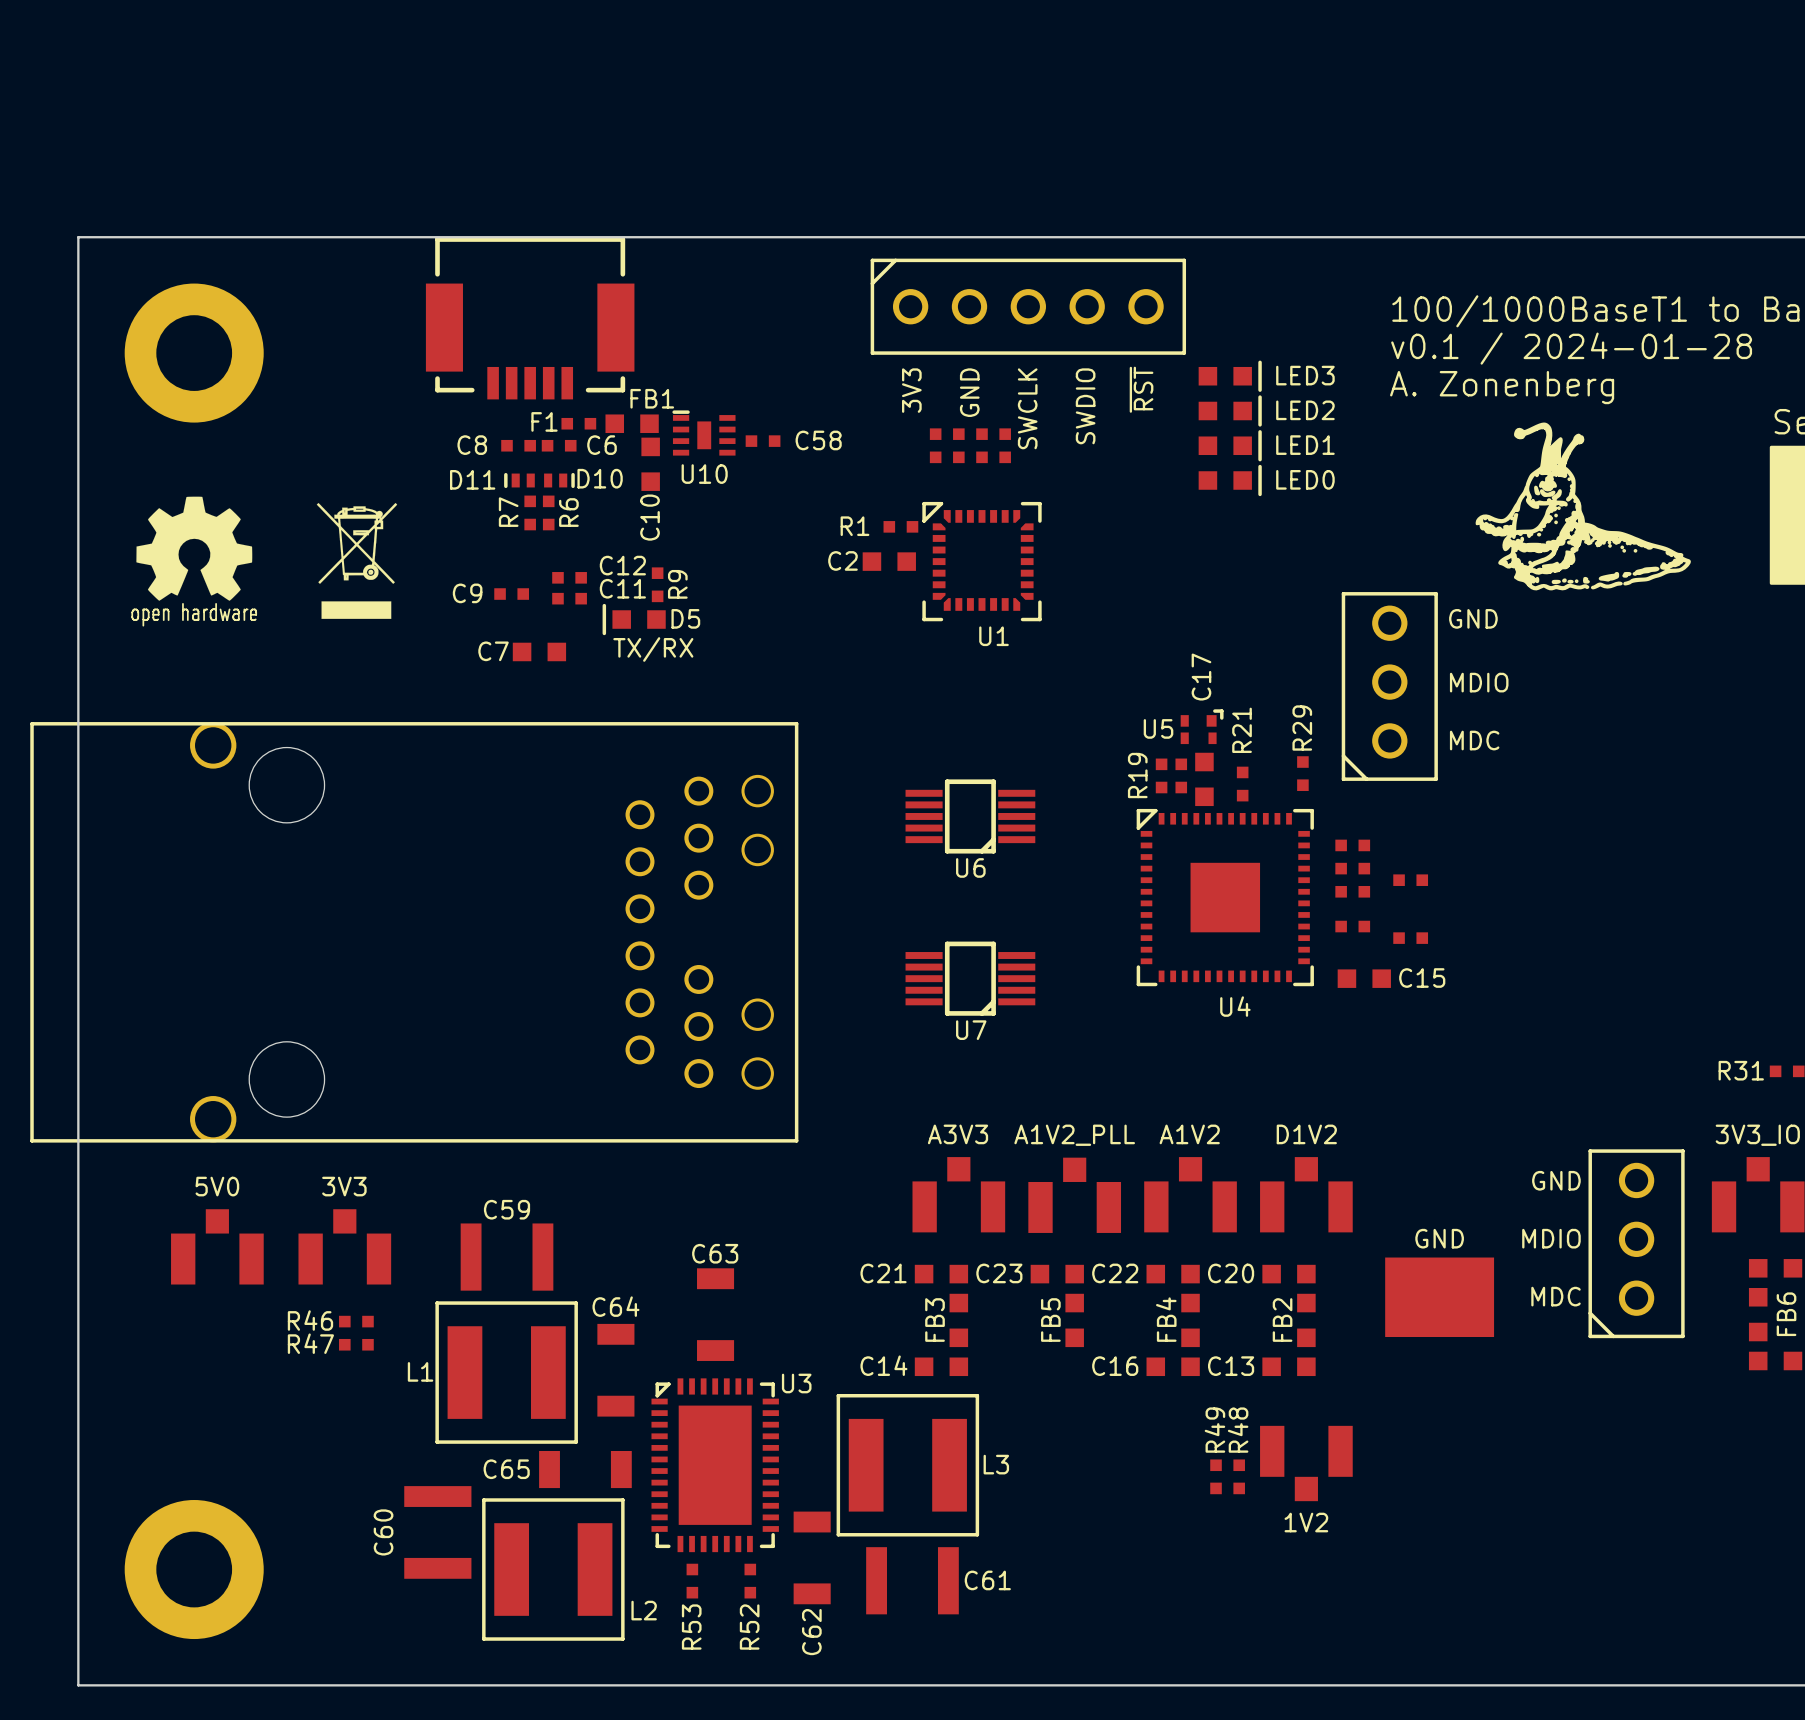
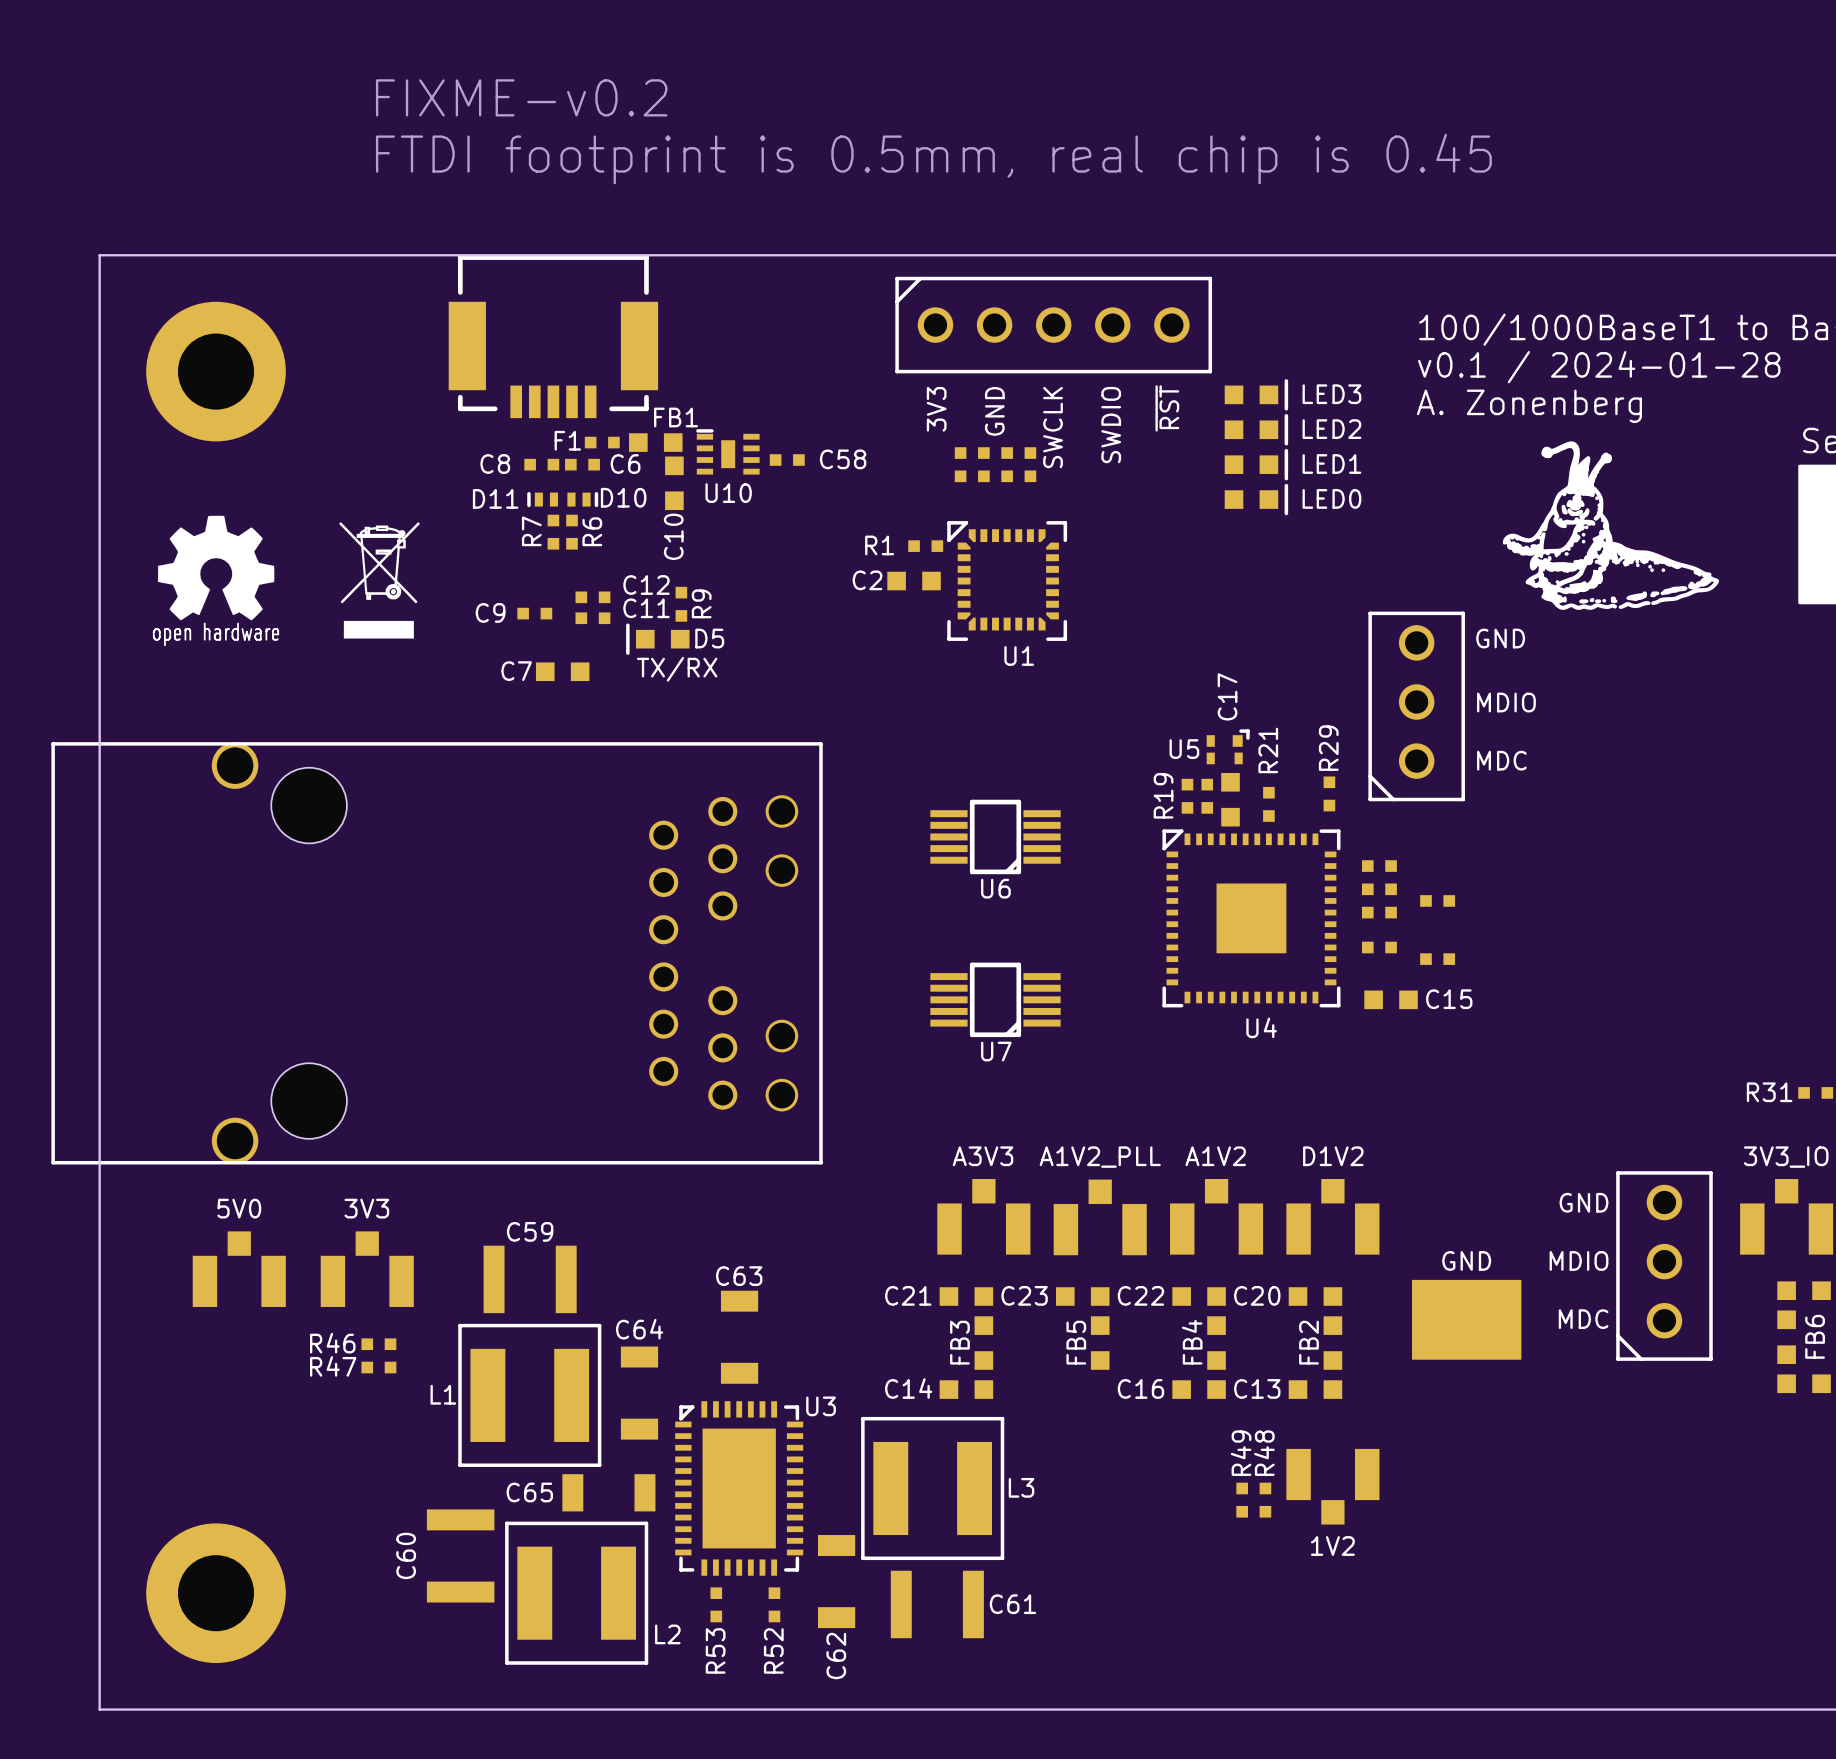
text: none -> FIXME-v0.2 (521, 97)
text: none -> FTDI footprint is 0.5mm, real chip is 0.45 (933, 159)

